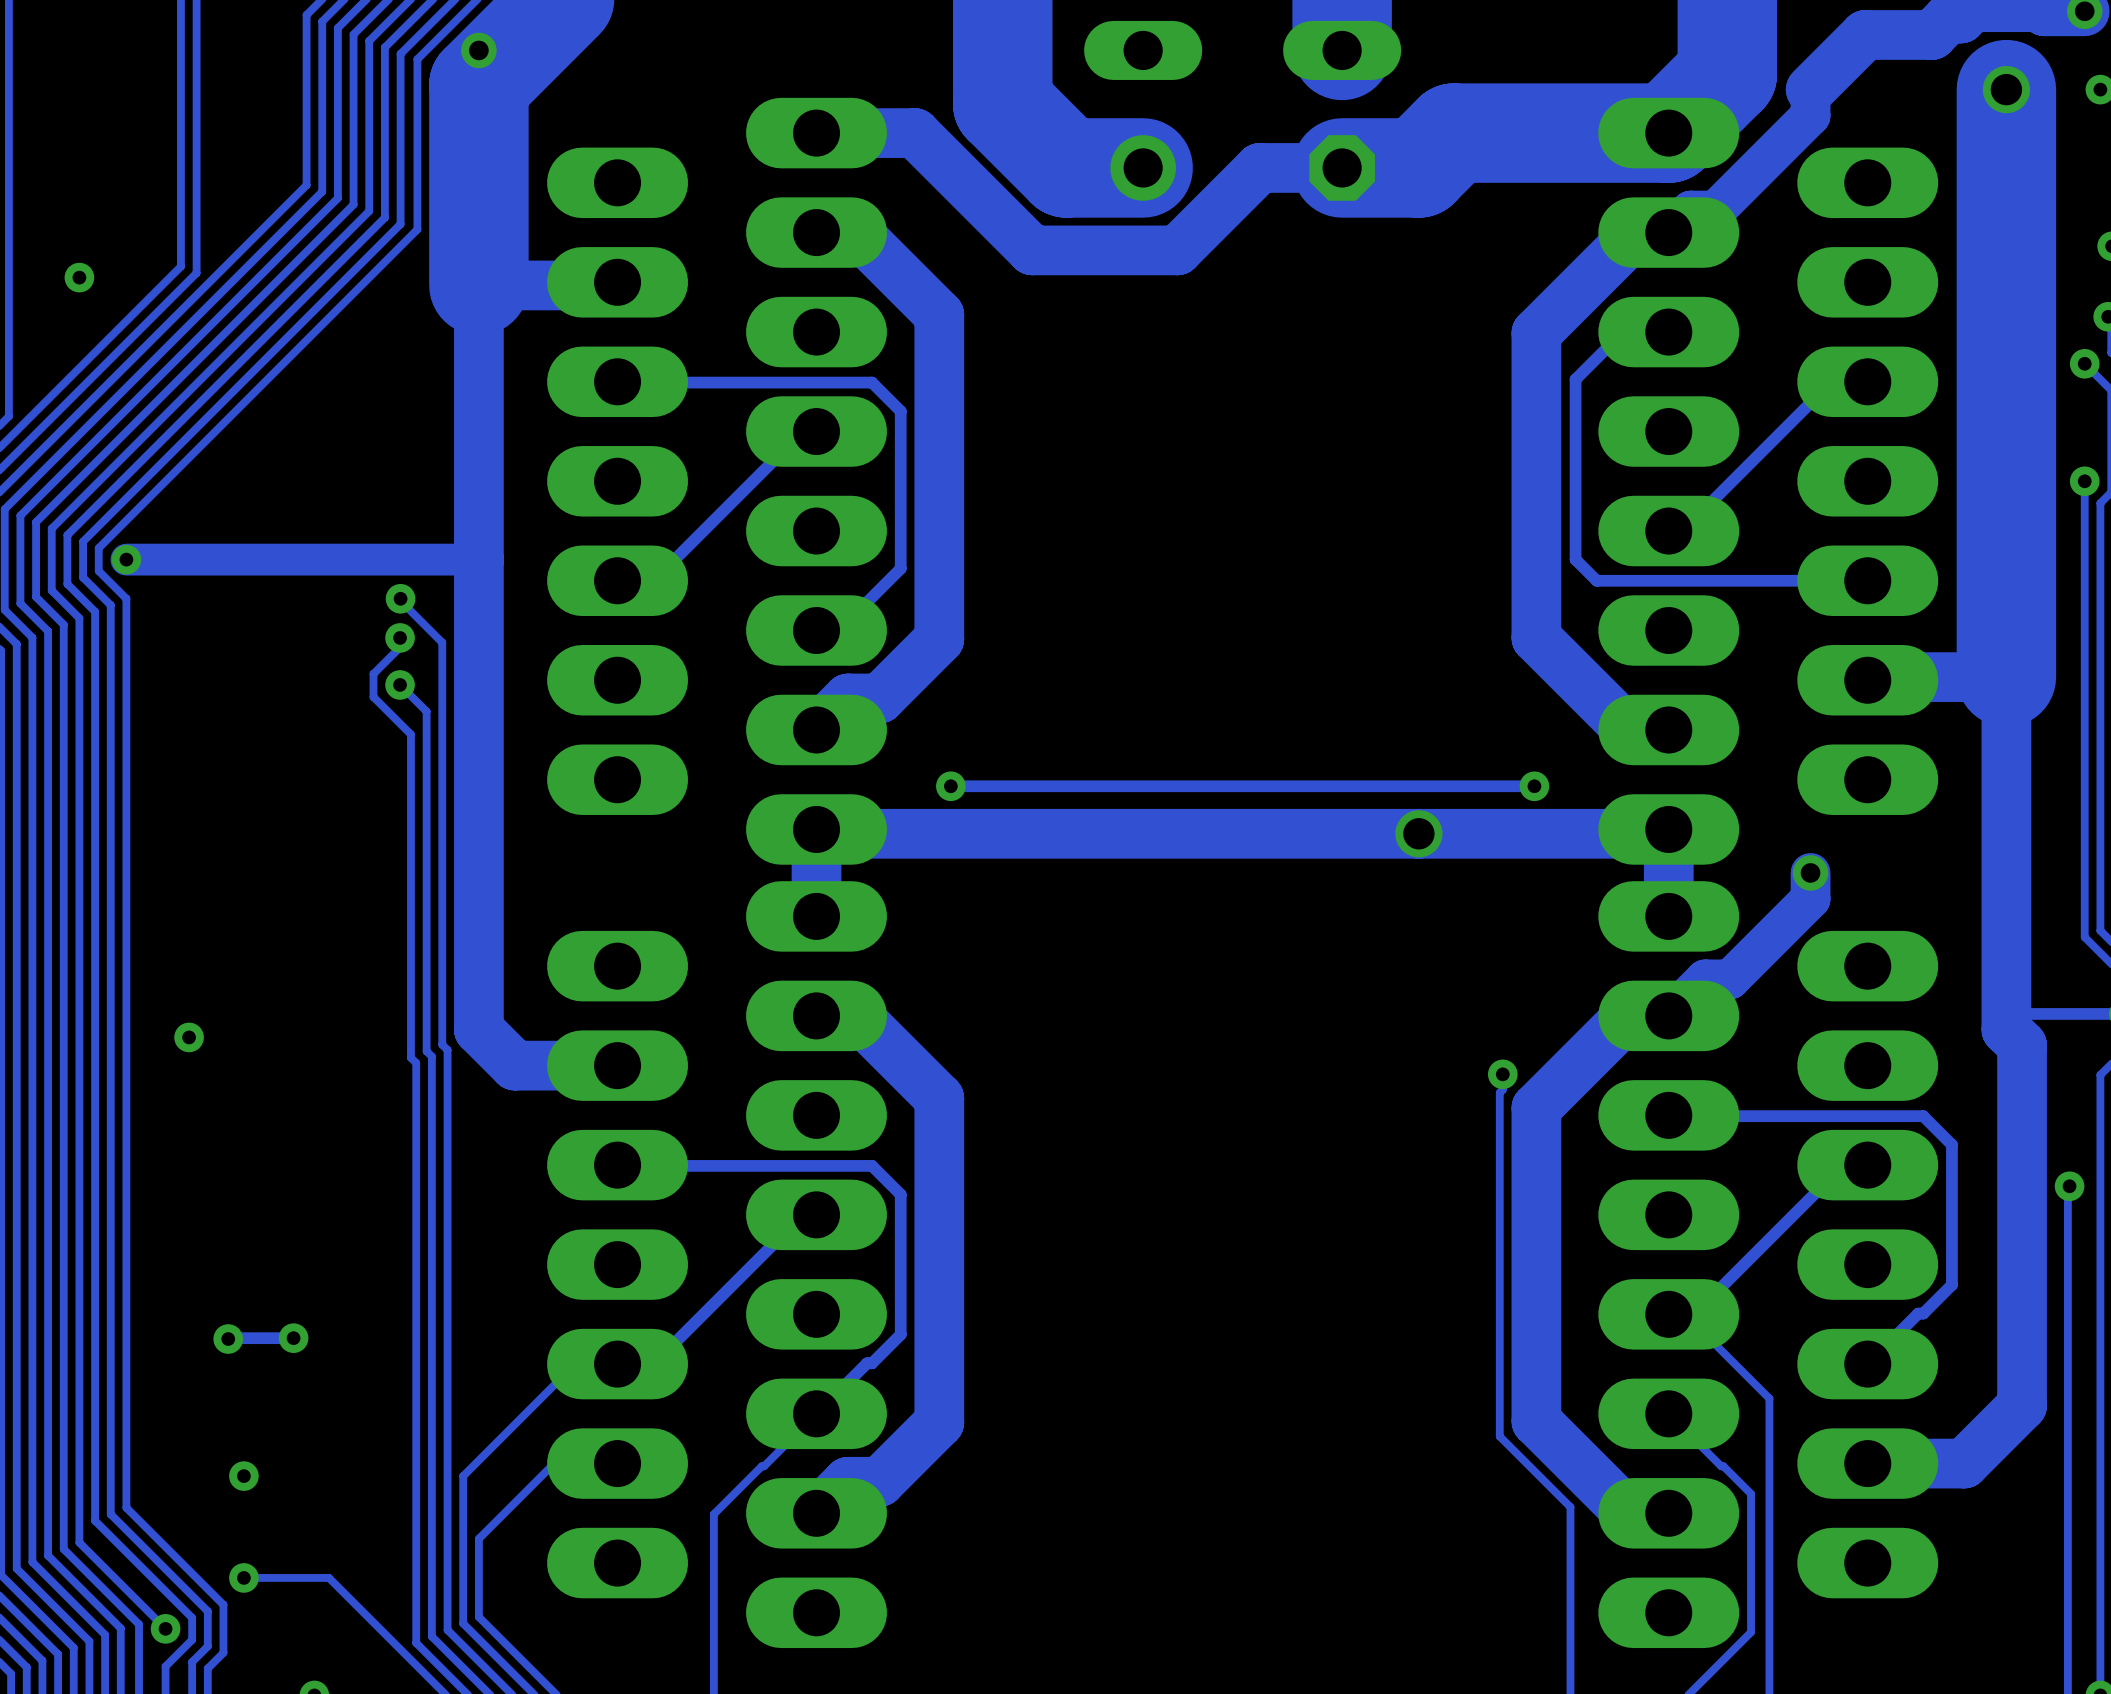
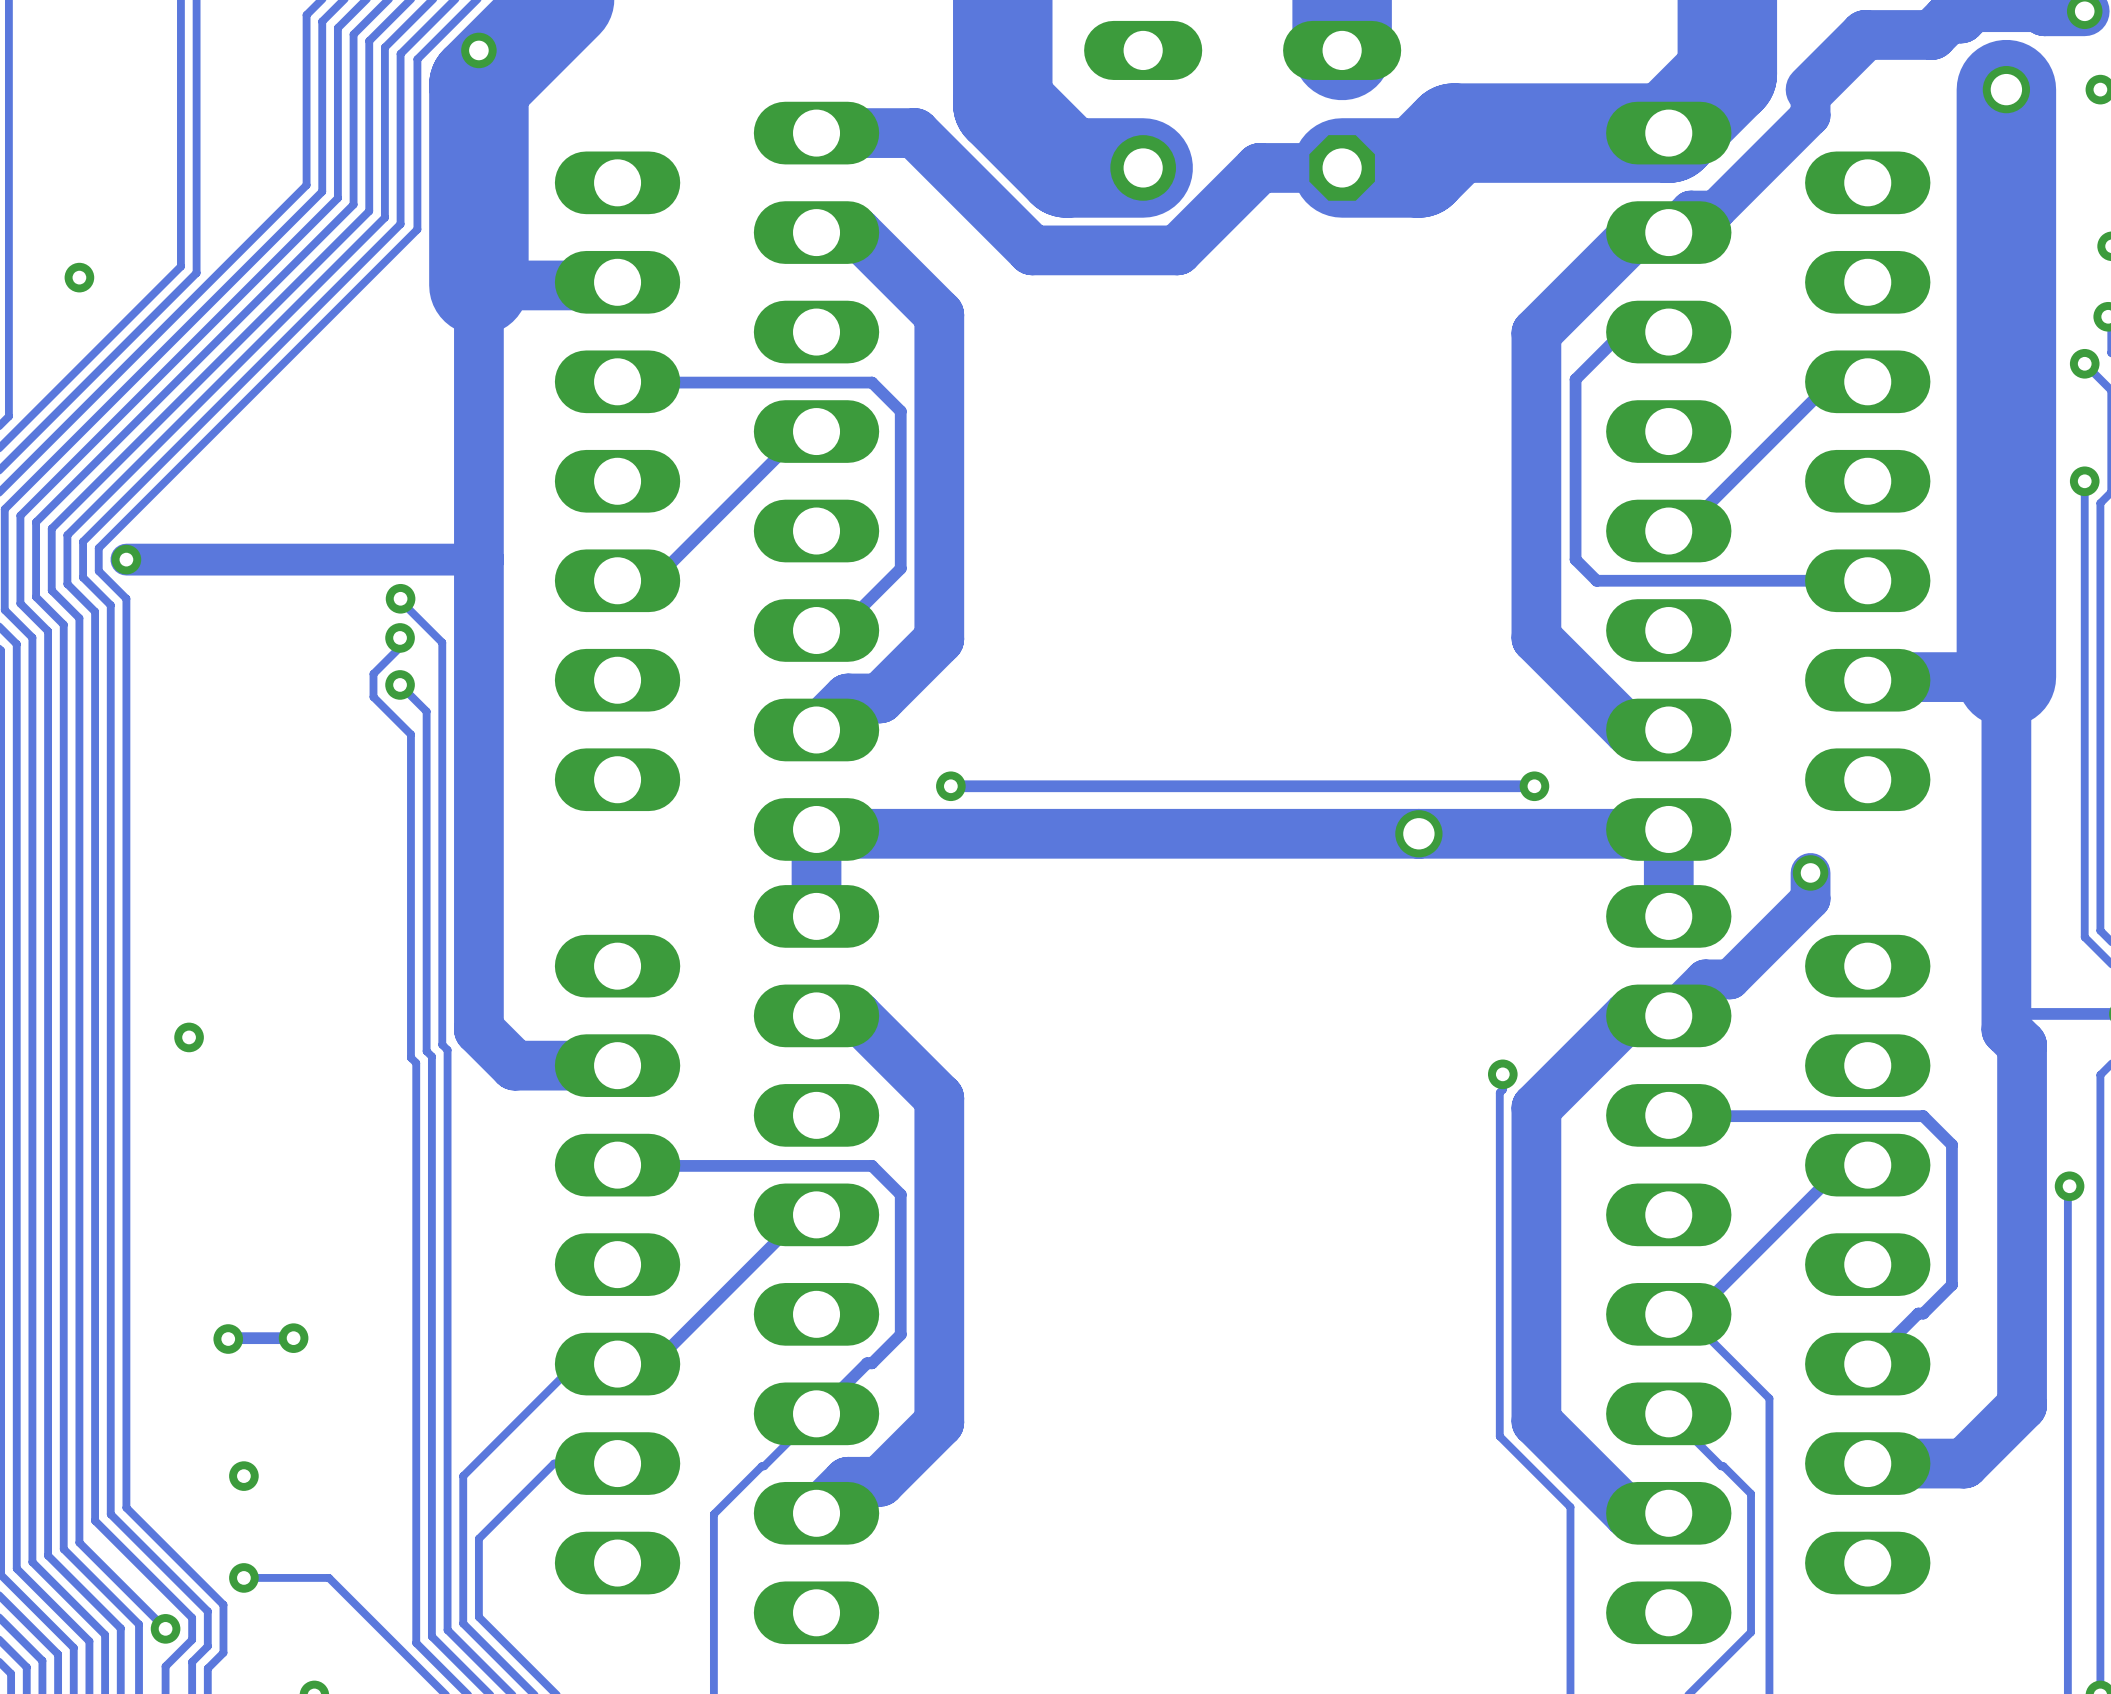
part footprint: [547, 97, 888, 865] -> [554, 101, 880, 861]
part footprint: [1598, 97, 1939, 865] -> [1606, 101, 1931, 861]
part footprint: [547, 881, 888, 1649] -> [554, 885, 880, 1645]
part footprint: [1598, 881, 1939, 1649] -> [1606, 885, 1931, 1645]

